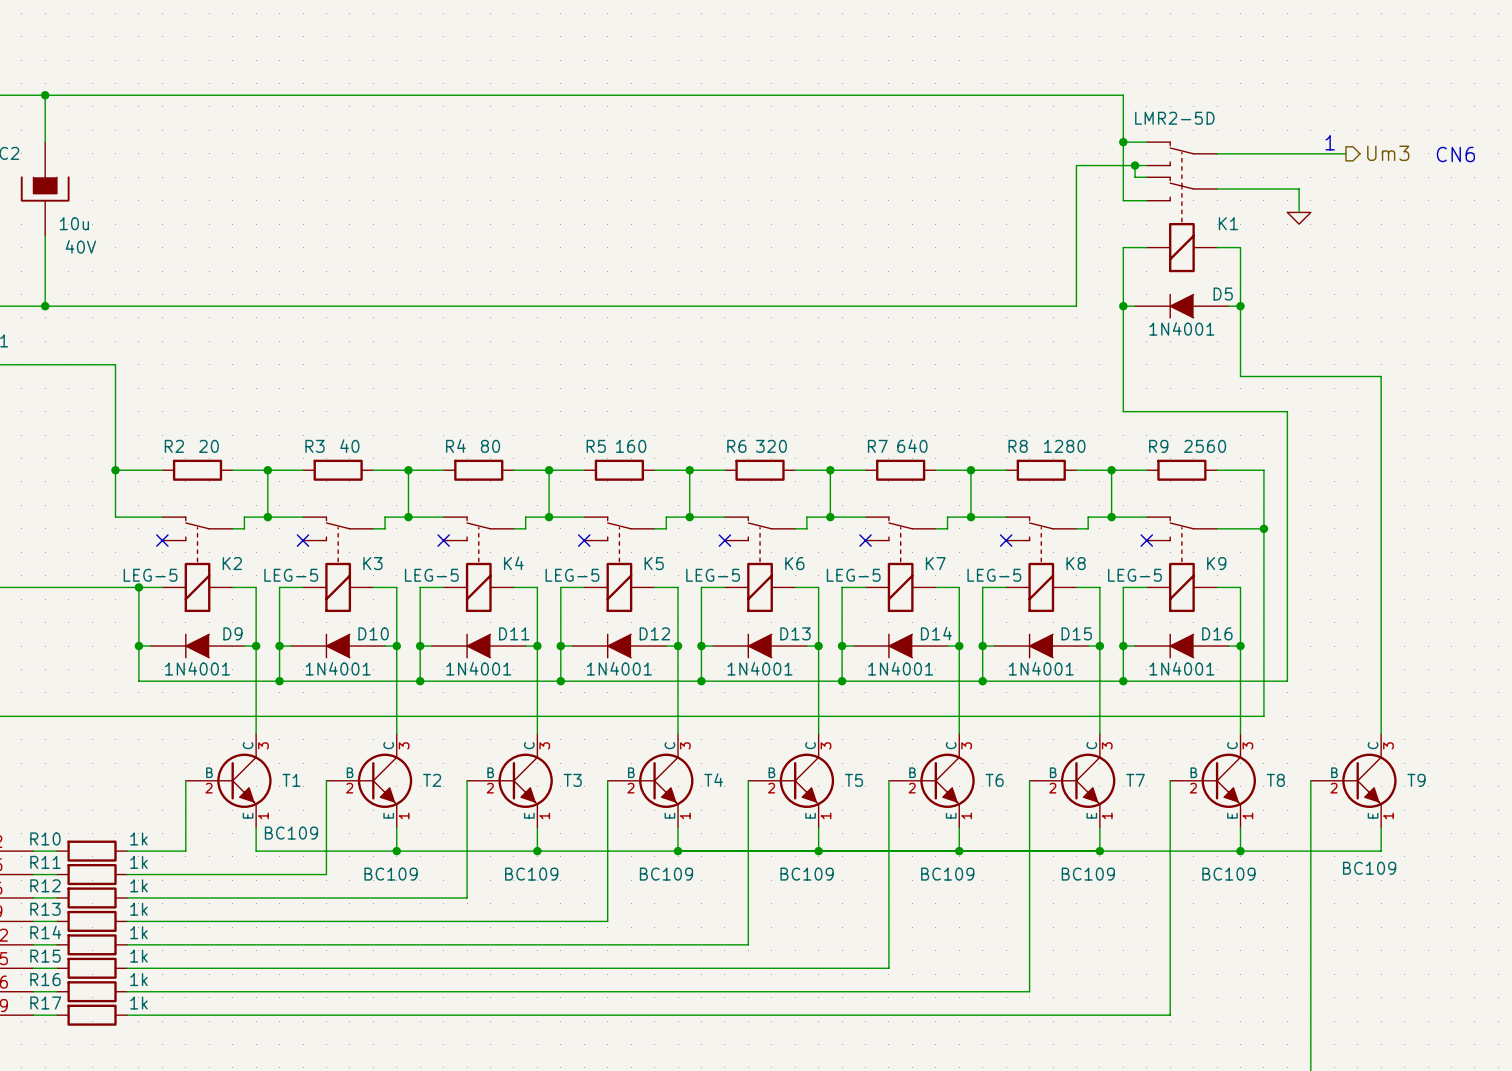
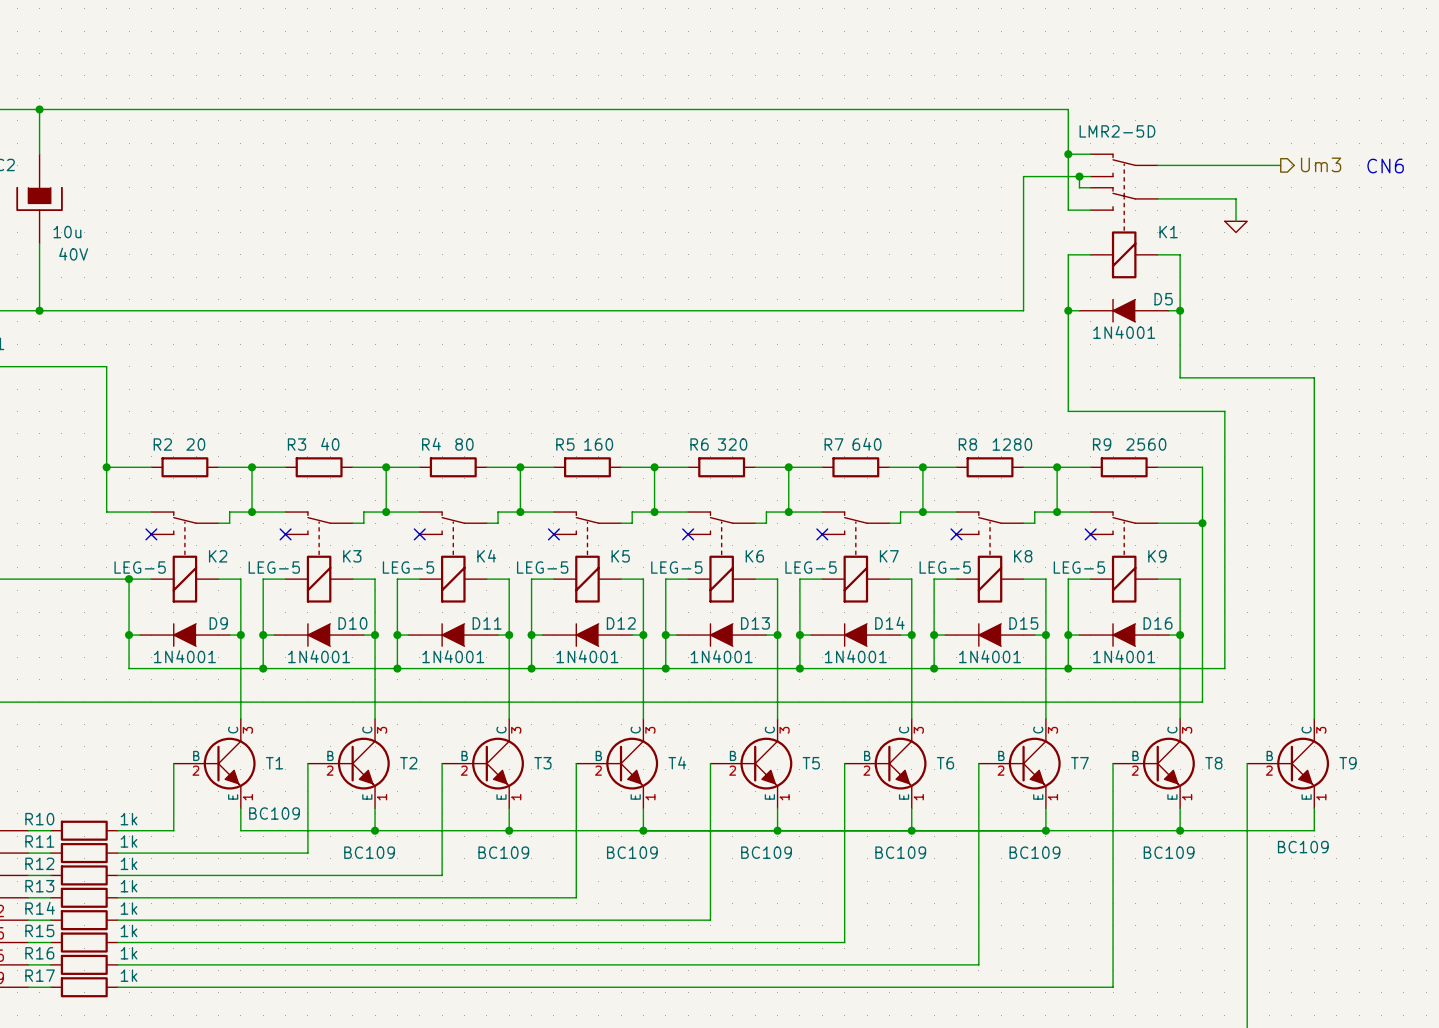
text: 1 (1330, 142) -> none

